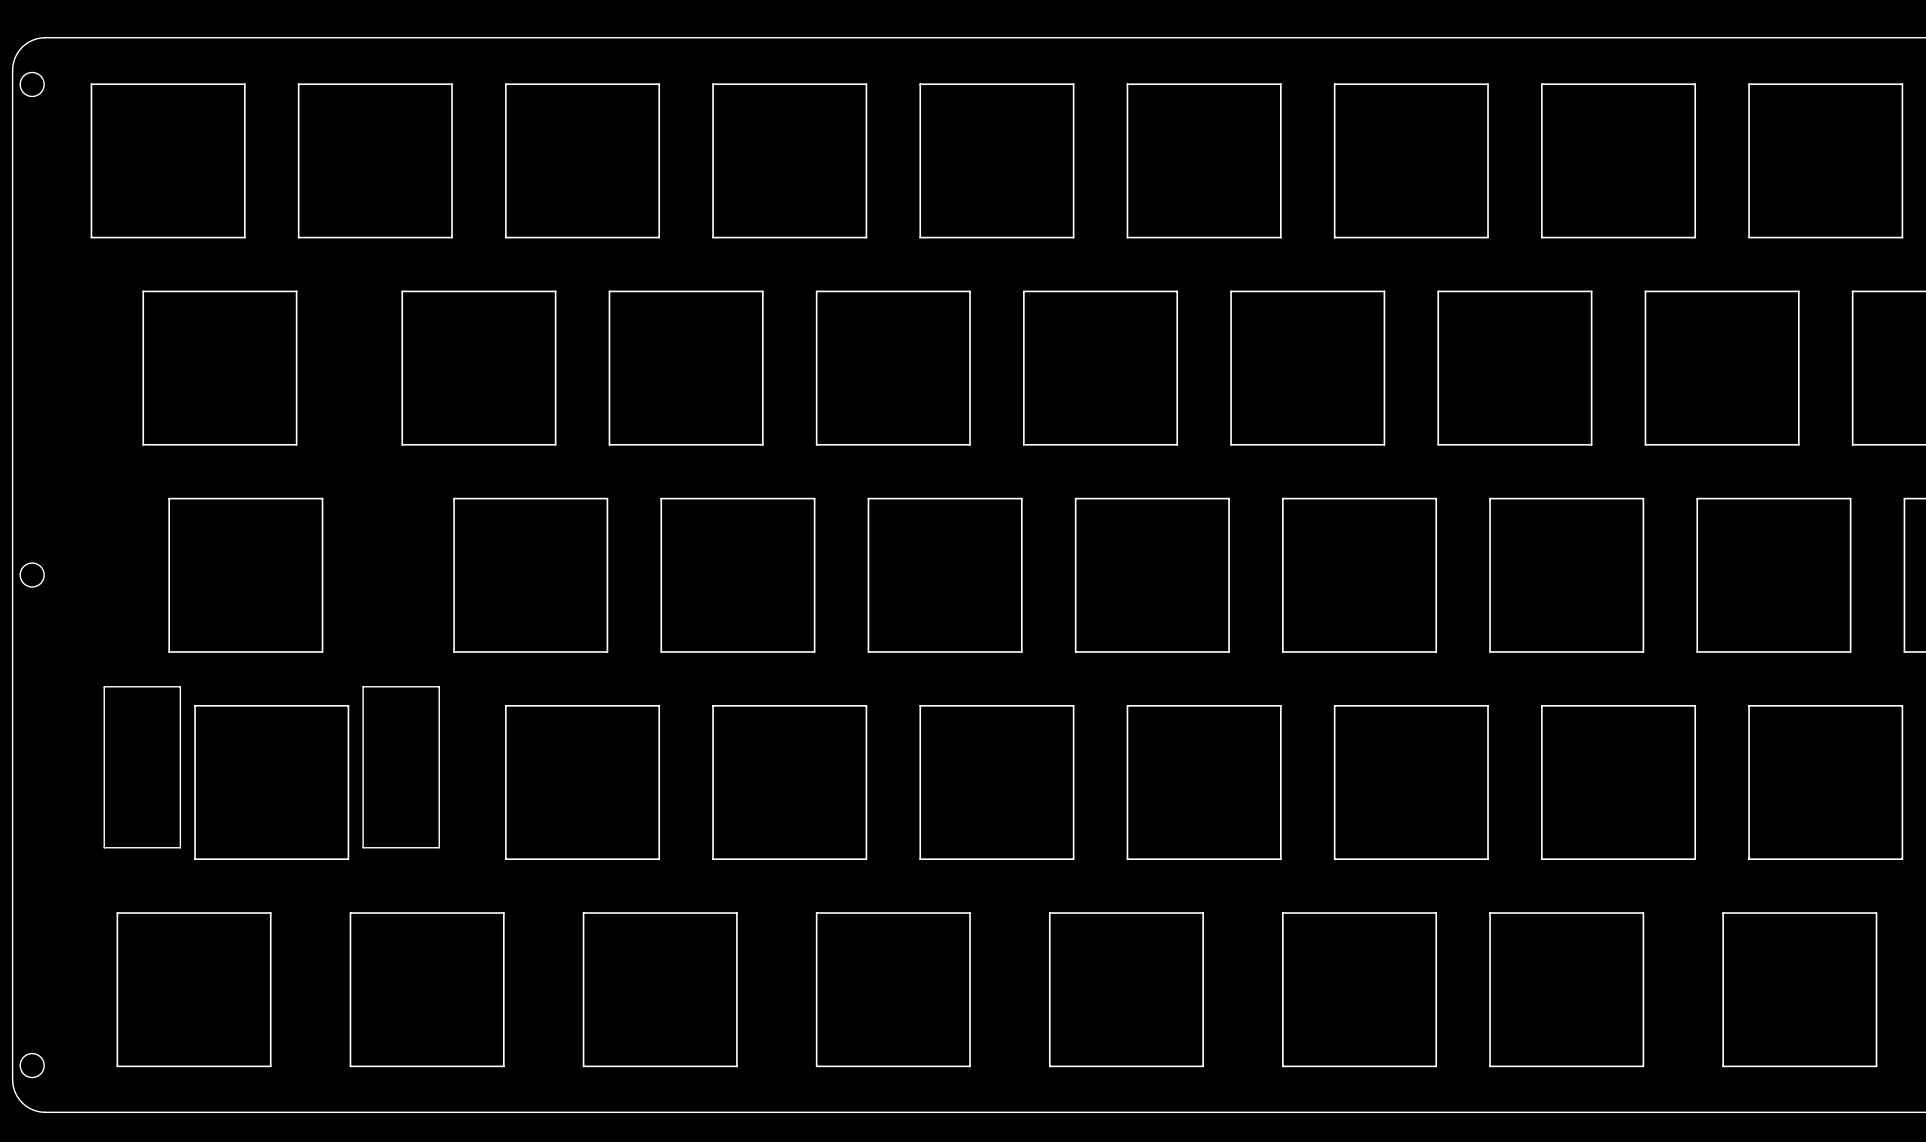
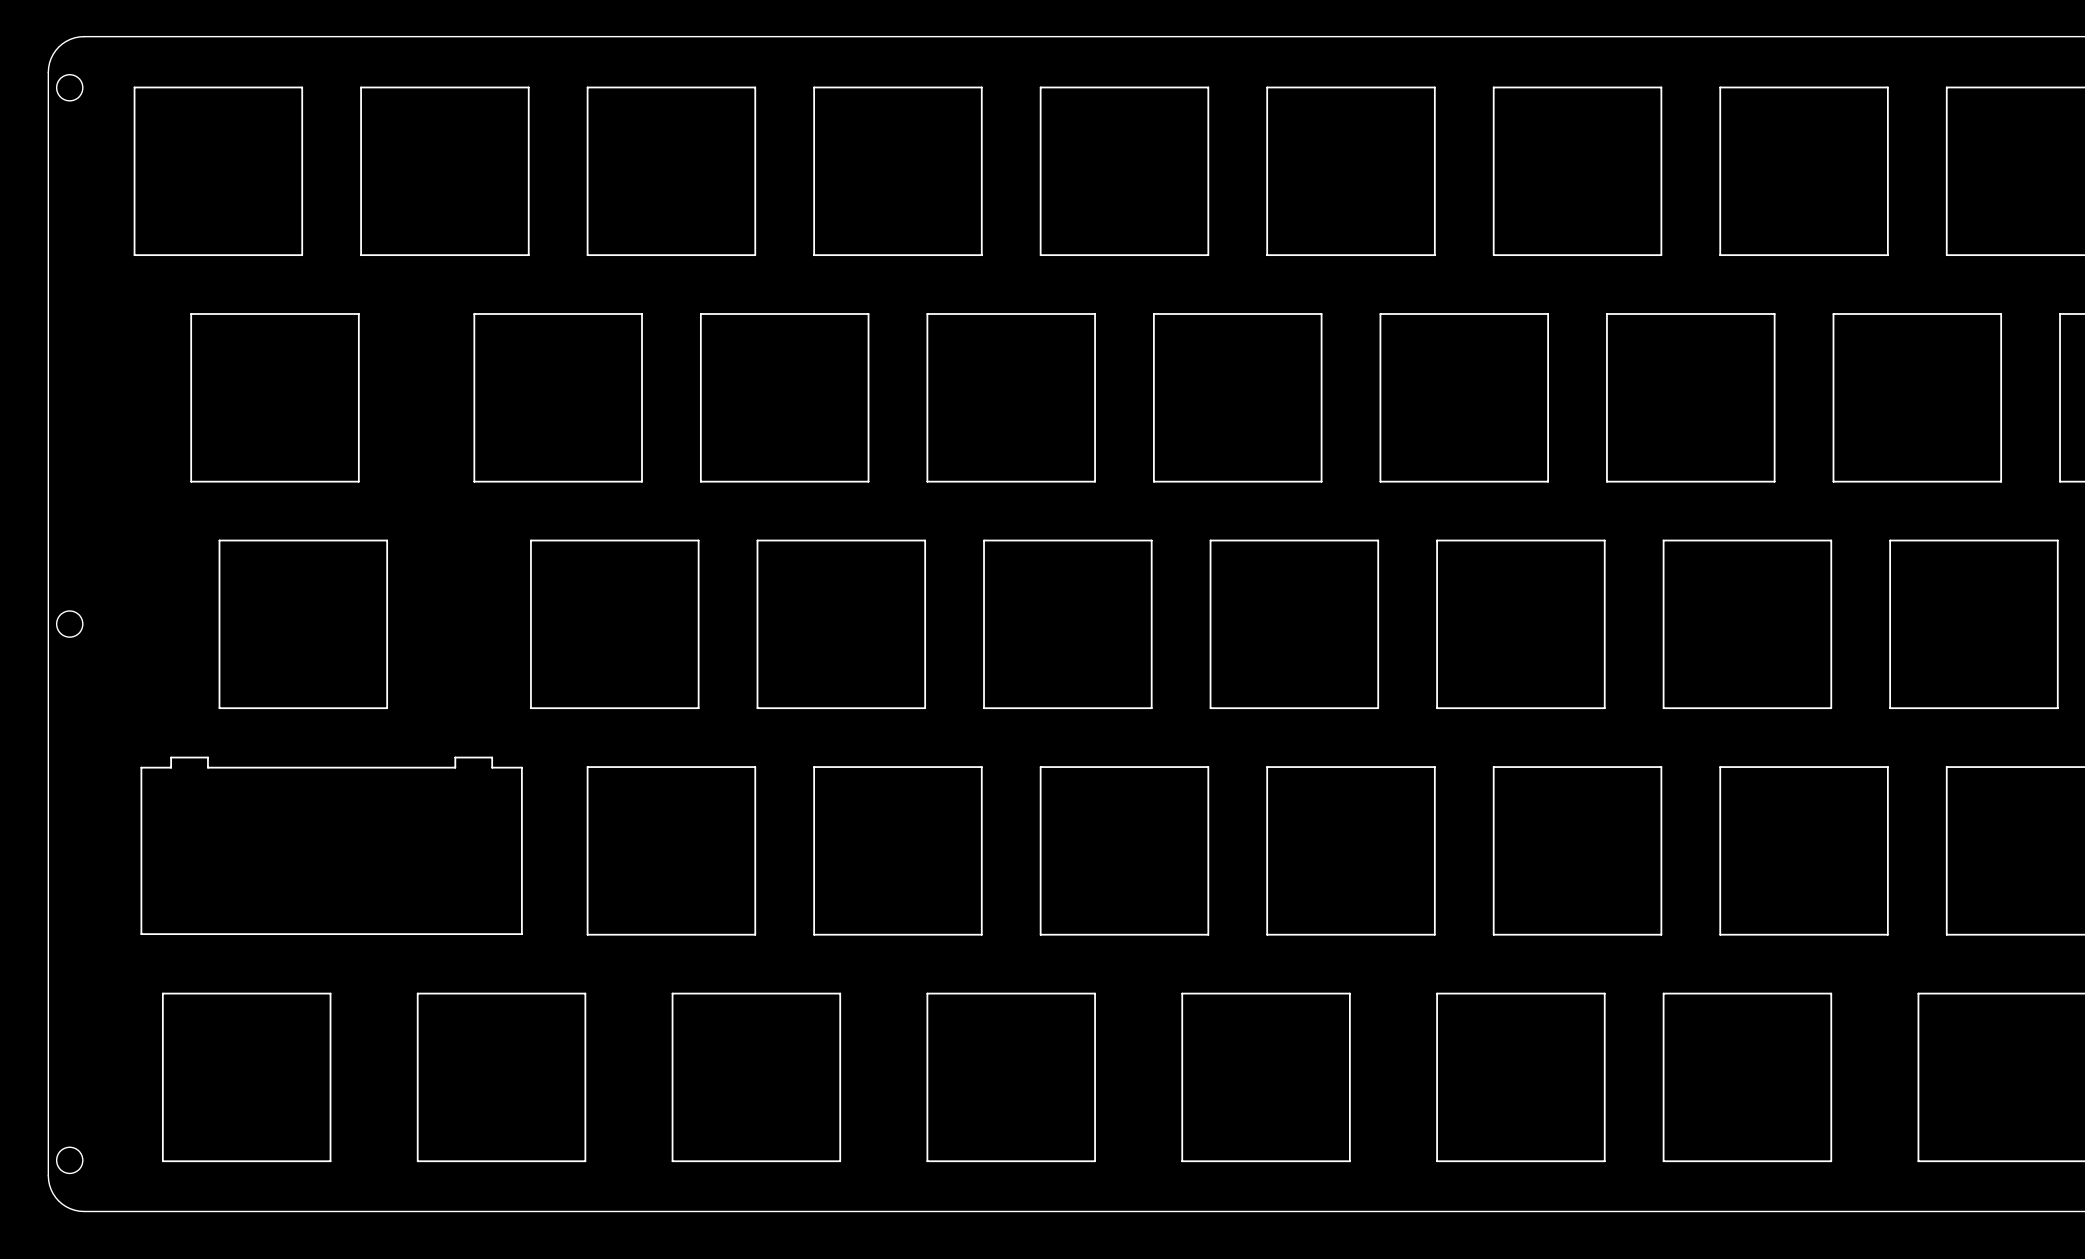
drawing shape: [103, 686, 440, 860] -> [140, 756, 523, 936]

